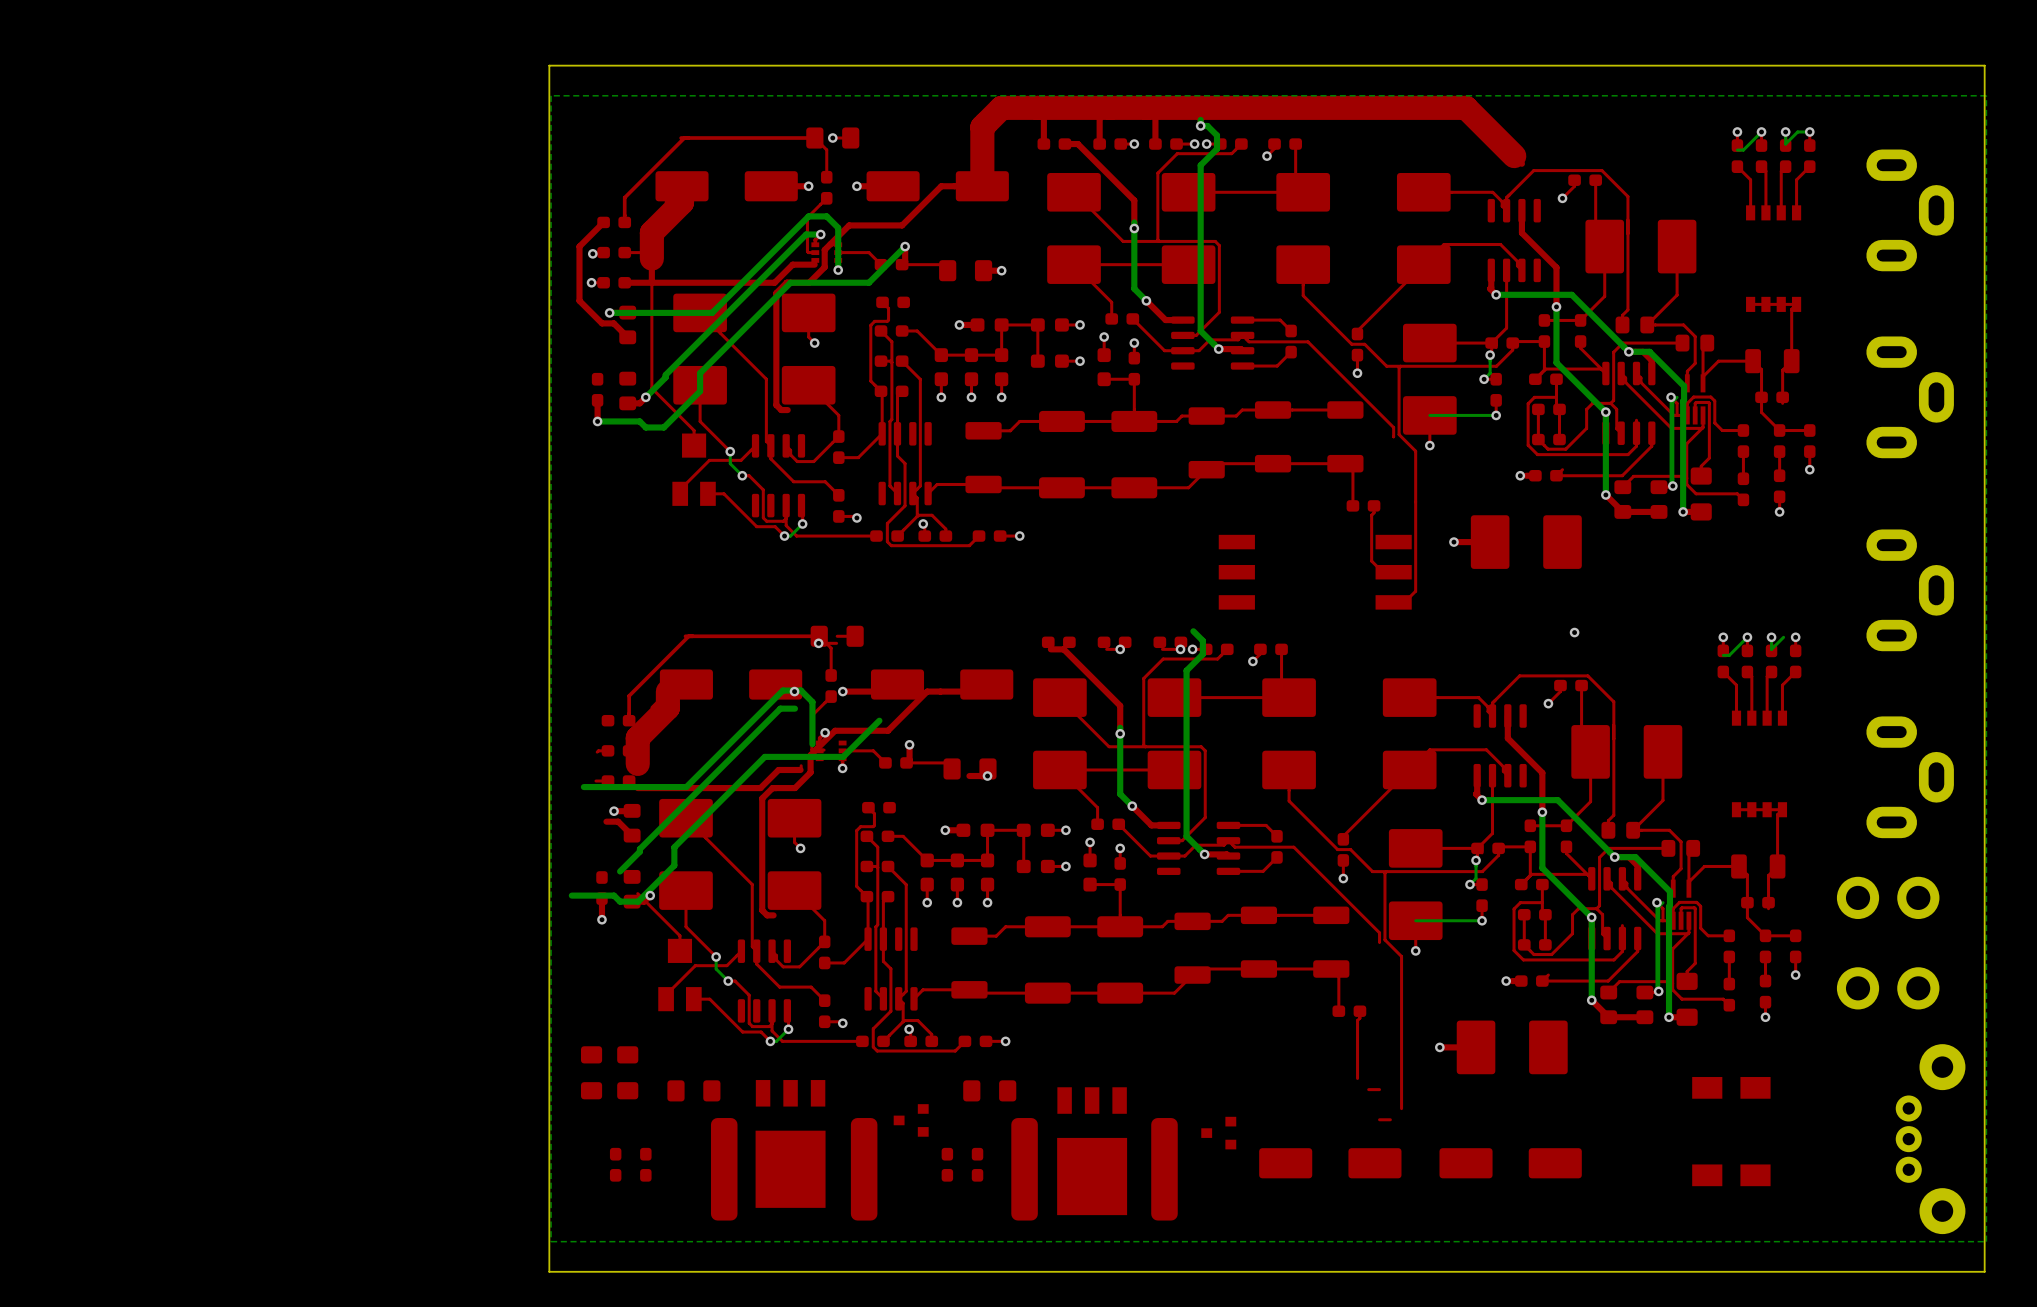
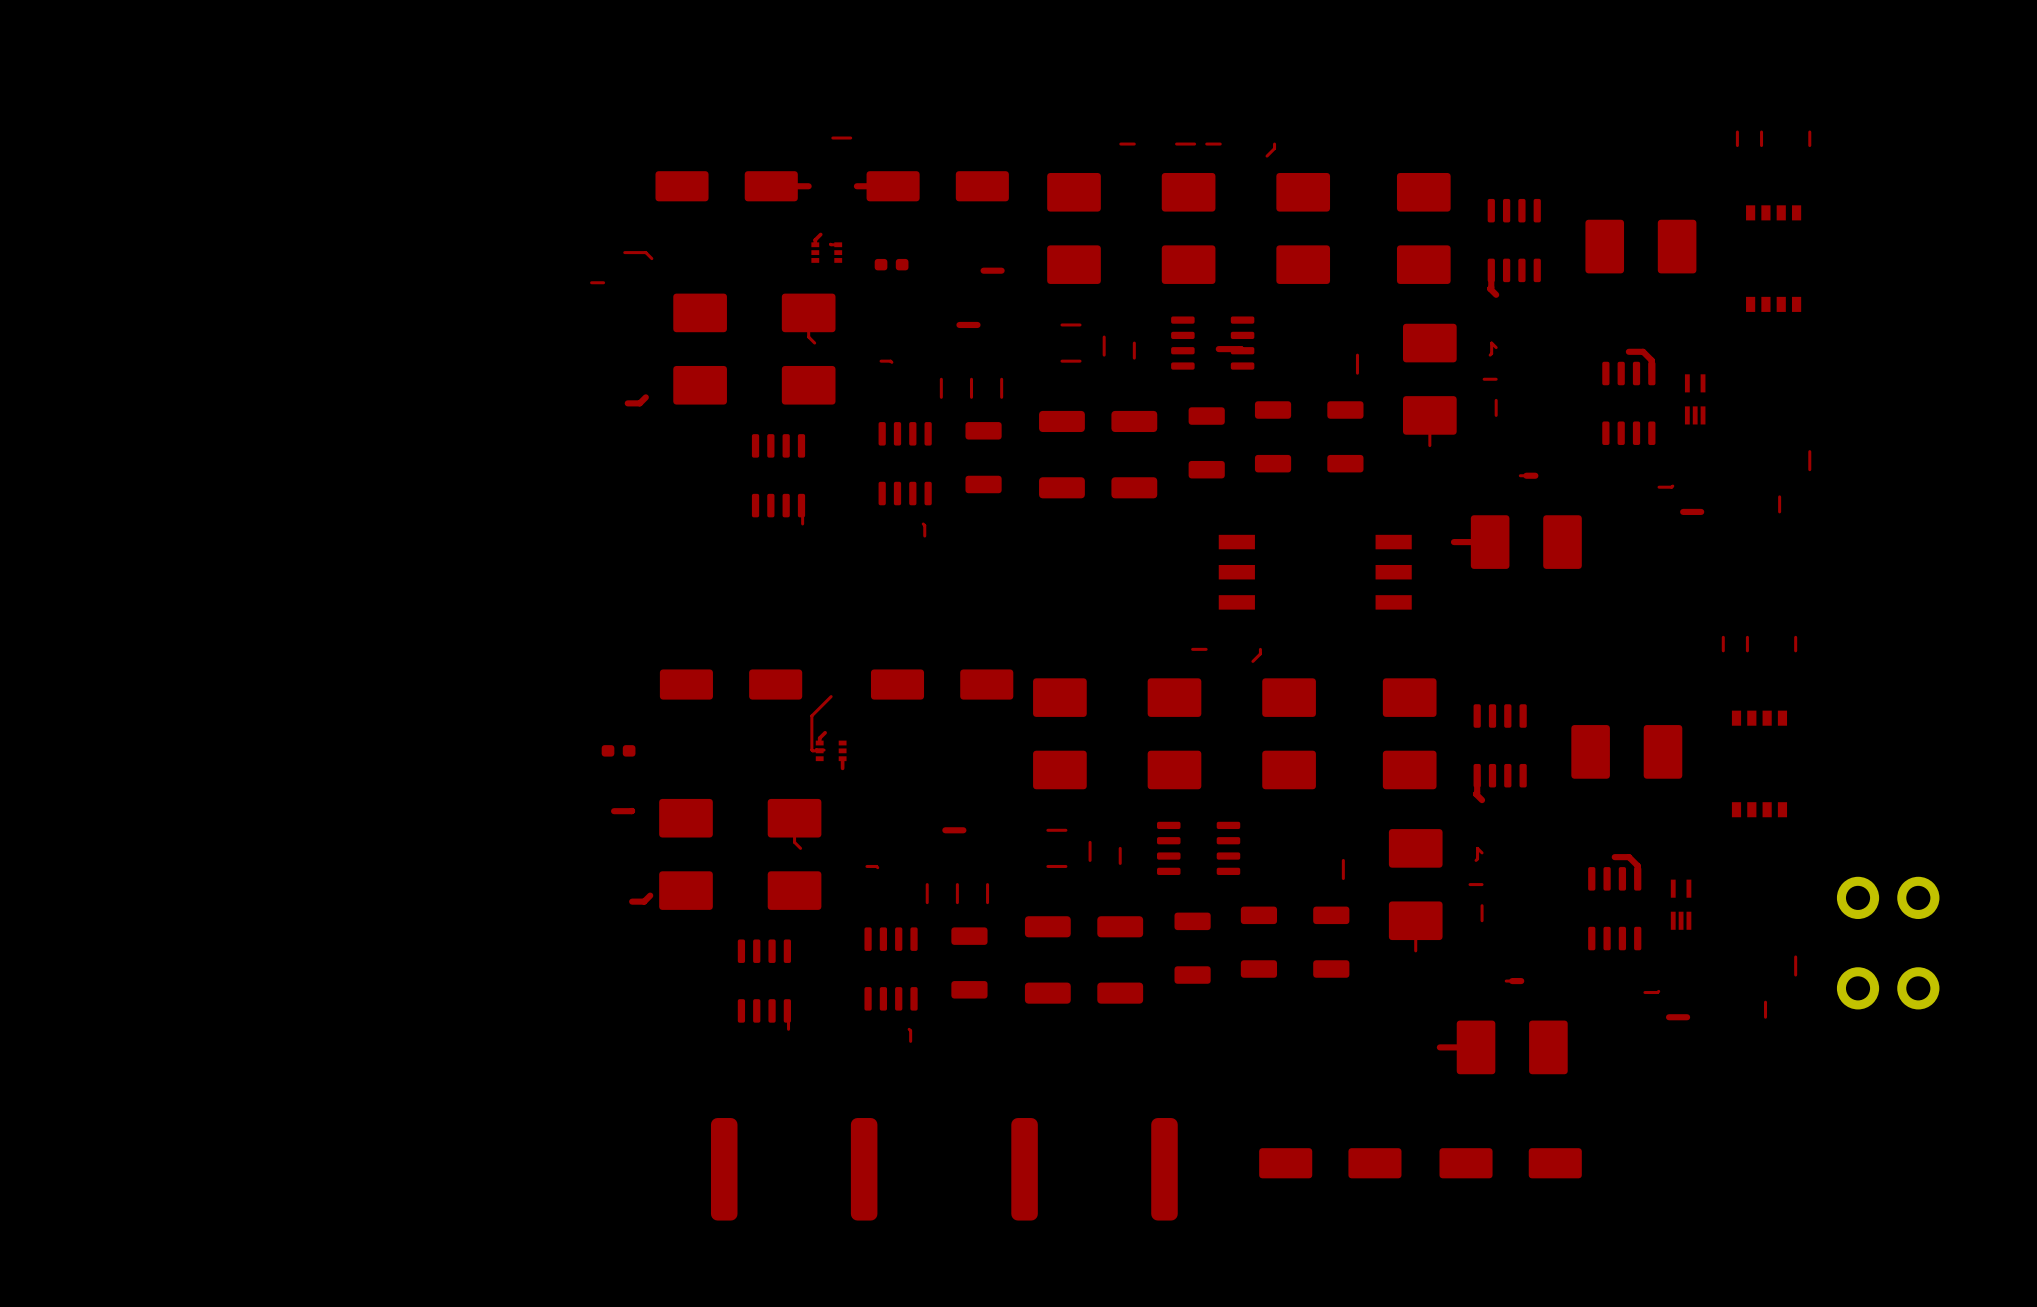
board edge: (1984, 65) (1984, 1271) (549, 1271) (549, 65) (1984, 65) -> none
bottom zone outline: (1986, 95) (551, 95) (551, 1241) (1986, 1241) (1986, 95) -> none
top track: (1037, 107) (1043, 113) (1043, 144) -> none
top track: (1110, 107) (1099, 118) (1099, 144) -> none
top track: (1146, 107) (1155, 116) (1155, 144) -> none
bottom track: (1200, 119) (1200, 125) (1207, 125) (1217, 135) (1217, 148) (1200, 165) (1200, 331) (1218, 349) -> none
via: (1200, 125) -> none
via: (1737, 131) -> none
bottom track: (1761, 131) (1743, 150) (1737, 150) -> none
via: (1761, 131) -> none
via: (1785, 131) -> none
bottom track: (1809, 131) (1797, 131) (1785, 144) (1785, 131) -> none
via: (1809, 131) -> none
top track: (681, 138) (814, 138) (826, 149) (826, 177) -> none
top track: (684, 138) (624, 197) (624, 222) -> none
part: (832, 138) -> none
via: (832, 138) -> none
part: (1054, 144) -> none
top track: (1064, 144) (1077, 144) (1134, 200) (1134, 228) -> none
part: (1110, 144) -> none
via: (1134, 144) -> none
part: (1165, 144) -> none
via: (1194, 144) -> none
via: (1206, 144) -> none
part: (1230, 144) -> none
top track: (1241, 144) (1231, 153) (1177, 153) (1157, 173) (1159, 241) -> none
part: (1285, 144) -> none
top track: (1295, 144) (1295, 184) (1303, 192) (1188, 192) -> none
via: (1267, 156) -> none
part: (1737, 156) -> none
part: (1761, 156) -> none
part: (1785, 156) -> none
part: (1809, 156) -> none
top track: (1521, 163) (1466, 107) (1001, 107) (982, 127) (982, 186) (941, 186) (902, 225) (849, 225) (824, 249) (824, 267) (809, 282) (786, 282) (776, 293) (776, 405) (781, 410) (787, 410) -> none
top track: (1737, 166) (1750, 179) (1750, 212) -> none
top track: (1761, 166) (1765, 171) (1765, 212) -> none
top track: (1785, 166) (1781, 171) (1781, 212) -> none
top track: (1809, 166) (1796, 179) (1796, 212) -> none
top track: (1574, 180) (1574, 186) (1562, 198) -> none
part: (1585, 180) -> none
top track: (1595, 180) (1595, 237) (1604, 246) (1604, 296) (1580, 320) (1544, 320) -> none
via: (808, 186) -> none
via: (856, 186) -> none
part: (826, 187) -> none
top track: (1074, 192) (1123, 241) (1215, 241) (1219, 245) (1219, 312) (1196, 335) (1182, 335) -> none
top track: (1423, 192) (1492, 192) (1502, 201) (1502, 206) (1506, 210) (1506, 197) (1533, 170) (1601, 170) (1627, 196) (1627, 309) (1622, 315) (1622, 324) -> none
top track: (826, 198) (807, 217) (807, 251) (815, 252) -> none
via: (1562, 198) -> none
top track: (666, 202) (682, 186) (682, 202) (651, 232) (651, 388) (694, 430) (694, 445) -> none
top track: (1521, 210) (1521, 233) (1556, 267) (1556, 306) -> none
part: (1910, 210) -> none
top track: (603, 222) (579, 246) (579, 300) (602, 323) (613, 323) (627, 337) -> none
part: (614, 222) -> none
bottom track: (1134, 222) (1134, 288) (1146, 300) -> none
via: (1134, 228) -> none
bottom track: (820, 234) (806, 234) (665, 374) (665, 377) (645, 397) -> none
via: (820, 234) -> none
top track: (905, 246) (905, 261) (902, 264) (941, 264) (947, 270) -> none
bottom track: (905, 246) (868, 282) (790, 282) (700, 373) (700, 391) (663, 427) (645, 427) (639, 421) (597, 421) -> none
via: (905, 246) -> none
top track: (1677, 246) (1677, 295) (1647, 324) (1683, 324) (1695, 336) (1695, 363) (1687, 371) (1687, 383) -> none
part: (614, 252) -> none
top track: (838, 252) (868, 252) (881, 264) -> none
via: (592, 253) -> none
top track: (815, 260) (814, 264) (792, 264) (774, 282) (624, 282) -> none
top track: (1188, 264) (1074, 264) (1111, 302) (1111, 318) -> none
top track: (1303, 264) (1303, 295) (1351, 344) (1364, 344) (1386, 366) (1496, 366) (1512, 349) (1514, 341) (1544, 341) (1544, 370) -> none
bottom track: (838, 270) (838, 227) (826, 216) (808, 216) (712, 312) (609, 312) -> none
via: (838, 270) -> none
part: (965, 270) -> none
via: (1001, 270) -> none
top track: (1506, 270) (1506, 328) (1491, 343) (1429, 343) -> none
top track: (1521, 270) (1517, 265) (1517, 261) (1500, 244) (1443, 244) (1357, 331) (1357, 334) -> none
via: (591, 282) -> none
part: (614, 282) -> none
bottom track: (1496, 294) (1571, 294) (1628, 351) (1649, 351) (1684, 386) (1683, 511) -> none
via: (1496, 294) -> none
top track: (1146, 300) (1165, 320) (1182, 320) -> none
via: (1146, 300) -> none
top track: (882, 302) (888, 308) (888, 320) (874, 321) (870, 325) (870, 381) (882, 392) (882, 433) (858, 457) (838, 457) -> none
part: (893, 302) -> none
top track: (1750, 304) (1796, 304) (1791, 309) (1791, 361) (1782, 370) (1782, 403) -> none
bottom track: (1556, 306) (1556, 362) (1605, 412) (1605, 494) -> none
via: (1556, 306) -> none
via: (609, 312) -> none
top track: (700, 312) (766, 379) (766, 441) (770, 445) (770, 458) (793, 481) (825, 481) (838, 495) -> none
part: (1122, 318) -> none
top track: (1132, 318) (1164, 350) (1199, 350) (1209, 339) (1238, 339) (1242, 335) (1249, 341) (1307, 341) (1393, 427) (1393, 436) -> none
top track: (1242, 320) (1280, 320) (1291, 331) -> none
part: (627, 324) -> none
via: (959, 324) -> none
part: (989, 324) -> none
part: (1049, 324) -> none
via: (1080, 324) -> none
part: (1634, 324) -> none
top track: (881, 331) (891, 341) (889, 485) (897, 493) -> none
part: (891, 331) -> none
top track: (902, 331) (917, 331) (941, 355) (1001, 355) (1001, 324) (1037, 324) (1037, 361) -> none
part: (1544, 331) -> none
part: (1580, 331) -> none
via: (1104, 337) -> none
part: (1291, 341) -> none
top track: (1580, 341) (1580, 348) (1605, 373) -> none
via: (814, 343) -> none
via: (1134, 343) -> none
part: (1502, 343) -> none
top track: (1682, 343) (1622, 343) (1613, 352) (1613, 400) (1610, 403) -> none
part: (1694, 343) -> none
part: (1357, 344) -> none
top track: (1703, 345) (1703, 383) -> none
via: (1218, 349) -> none
via: (1628, 351) -> none
top track: (1291, 352) (1277, 366) (1242, 366) -> none
bottom track: (1490, 355) (1490, 373) (1484, 379) -> none
via: (1490, 355) -> none
part: (891, 361) -> none
top track: (902, 361) (920, 379) (920, 485) (912, 493) (917, 498) (917, 516) -> none
part: (1049, 361) -> none
via: (1080, 361) -> none
part: (1772, 361) -> none
top track: (1400, 366) (1399, 434) (1415, 451) (1415, 591) (1404, 602) (1393, 602) -> none
part: (941, 367) -> none
part: (971, 367) -> none
part: (1001, 367) -> none
part: (1104, 367) -> none
part: (1134, 368) -> none
top track: (1601, 369) (1545, 369) (1535, 379) -> none
via: (1357, 373) -> none
top track: (1621, 373) (1625, 377) (1625, 382) (1671, 428) (1702, 428) -> none
top track: (1636, 373) (1640, 377) (1640, 382) (1673, 415) (1687, 415) (1687, 403) (1693, 397) (1710, 397) (1714, 401) (1714, 422) (1722, 430) (1743, 430) -> none
top track: (1703, 376) (1718, 361) (1753, 361) (1761, 369) (1761, 412) (1779, 430) (1809, 430) -> none
top track: (1104, 379) (1134, 379) (1134, 421) -> none
via: (1484, 379) -> none
part: (1545, 379) -> none
top track: (1556, 379) (1556, 406) (1559, 409) (1559, 439) -> none
top track: (700, 385) (700, 421) (730, 451) -> none
top track: (808, 385) (838, 415) (838, 436) (813, 461) (797, 461) (790, 454) (790, 450) (786, 445) -> none
part: (597, 389) -> none
part: (1496, 389) -> none
part: (627, 391) -> none
part: (891, 391) -> none
top track: (902, 391) (897, 395) (897, 456) (905, 463) (905, 505) (887, 523) (887, 541) (891, 545) (969, 545) (979, 536) -> none
via: (645, 397) -> none
via: (941, 397) -> none
via: (971, 397) -> none
via: (1001, 397) -> none
top track: (1556, 397) (1534, 397) (1528, 403) (1528, 445) (1537, 454) (1628, 454) (1636, 446) (1636, 420) -> none
top track: (1671, 397) (1677, 403) (1677, 415) -> none
via: (1671, 397) -> none
bottom track: (1677, 397) (1672, 401) (1672, 486) (1671, 484) (1671, 397) -> none
part: (1772, 397) -> none
part: (1910, 397) -> none
top track: (597, 400) (597, 421) -> none
top track: (1610, 403) (1616, 409) (1616, 428) (1621, 433) -> none
top track: (1610, 403) (1592, 403) (1586, 409) (1586, 428) (1565, 449) (1548, 449) (1538, 439) (1538, 409) -> none
part: (1548, 409) -> none
top track: (1345, 410) (1242, 410) (1236, 416) (1181, 416) (1176, 421) (1019, 421) (1010, 430) (983, 430) -> none
via: (1605, 412) -> none
bottom track: (1496, 415) (1429, 415) -> none
via: (1496, 415) -> none
top track: (1695, 415) (1696, 402) (1709, 403) (1709, 458) (1701, 466) (1701, 476) -> none
top track: (1703, 415) (1703, 427) (1686, 443) (1686, 484) (1696, 493) (1737, 493) (1743, 499) -> none
via: (597, 421) -> none
top track: (1651, 433) (1651, 446) (1622, 475) (1556, 475) (1562, 469) -> none
part: (1548, 439) -> none
part: (1743, 441) -> none
part: (1779, 441) -> none
part: (1809, 441) -> none
top track: (755, 445) (741, 460) (709, 460) (680, 489) (680, 493) -> none
via: (1429, 445) -> none
part: (838, 447) -> none
bottom track: (730, 451) (730, 463) (742, 475) -> none
via: (730, 451) -> none
top track: (1743, 451) (1743, 478) -> none
top track: (1779, 451) (1779, 475) -> none
part: (694, 469) -> none
via: (1809, 469) -> none
top track: (742, 475) (749, 475) (763, 489) (763, 517) (766, 521) (783, 521) (786, 518) -> none
via: (742, 475) -> none
via: (1520, 475) -> none
part: (1545, 475) -> none
top track: (1686, 478) (1684, 476) (1633, 476) (1622, 487) -> none
via: (1672, 486) -> none
part: (1779, 486) -> none
part: (1743, 489) -> none
top track: (707, 493) (723, 493) (756, 526) (775, 526) (784, 536) -> none
top track: (928, 493) (937, 484) (983, 484) (986, 487) (1188, 487) (1212, 463) (1345, 463) (1352, 471) (1352, 505) -> none
part: (1701, 493) -> none
top track: (1605, 494) (1622, 511) (1659, 511) -> none
via: (1605, 494) -> none
part: (1622, 499) -> none
part: (1659, 499) -> none
top track: (786, 505) (786, 525) (796, 536) (876, 536) -> none
part: (838, 505) -> none
part: (1363, 505) -> none
top track: (1374, 505) (1374, 512) (1371, 515) (1371, 561) (1382, 572) (1393, 572) -> none
via: (1683, 511) -> none
via: (1779, 511) -> none
top track: (838, 516) (856, 517) -> none
via: (856, 517) -> none
bottom track: (802, 523) (790, 536) (784, 536) -> none
via: (802, 523) -> none
via: (923, 523) -> none
via: (784, 536) -> none
part: (887, 536) -> none
part: (935, 536) -> none
top track: (945, 536) (945, 529) (931, 515) (918, 515) (897, 536) -> none
part: (989, 536) -> none
top track: (1019, 536) (1000, 536) -> none
via: (1019, 536) -> none
via: (1453, 542) -> none
part: (1910, 590) -> none
bottom track: (1193, 631) (1202, 640) (1202, 654) (1186, 670) (1186, 836) (1204, 854) -> none
via: (1574, 632) -> none
top track: (685, 636) (819, 636) (831, 648) (831, 675) -> none
top track: (688, 636) (629, 695) (629, 720) -> none
part: (837, 636) -> none
top track: (855, 636) (837, 636) -> none
via: (1723, 637) -> none
bottom track: (1747, 637) (1729, 655) (1723, 655) -> none
via: (1747, 637) -> none
via: (1771, 637) -> none
bottom track: (1783, 637) (1771, 649) (1771, 637) -> none
via: (1795, 637) -> none
part: (1058, 642) -> none
part: (1114, 642) -> none
part: (1170, 642) -> none
via: (818, 643) -> none
top track: (836, 643) (818, 643) -> none
top track: (1050, 649) (1063, 649) (1120, 705) (1120, 733) -> none
top track: (1120, 649) (1106, 649) -> none
via: (1120, 649) -> none
top track: (1180, 649) (1162, 649) -> none
via: (1180, 649) -> none
via: (1192, 649) -> none
part: (1216, 649) -> none
top track: (1227, 649) (1217, 659) (1163, 659) (1143, 678) (1145, 746) -> none
part: (1270, 649) -> none
top track: (1281, 649) (1281, 690) (1289, 697) (1174, 697) -> none
via: (1252, 661) -> none
part: (1723, 661) -> none
part: (1747, 661) -> none
part: (1771, 661) -> none
part: (1795, 661) -> none
top track: (1723, 671) (1736, 685) (1736, 718) -> none
top track: (1747, 671) (1751, 676) (1751, 718) -> none
top track: (1771, 671) (1767, 676) (1767, 718) -> none
top track: (1795, 671) (1782, 685) (1782, 718) -> none
top track: (1560, 685) (1560, 691) (1548, 703) -> none
part: (1571, 685) -> none
top track: (1581, 685) (1581, 742) (1590, 751) (1590, 801) (1566, 825) (1530, 825) -> none
part: (831, 686) -> none
via: (794, 691) -> none
via: (842, 691) -> none
top track: (878, 691) (842, 691) -> none
top track: (968, 691) (927, 691) (888, 730) (835, 730) (810, 755) (810, 772) (795, 788) (772, 788) (762, 798) (762, 910) (767, 915) (773, 915) -> none
top track: (1059, 697) (1109, 746) (1201, 746) (1205, 750) (1205, 817) (1182, 840) (1168, 840) -> none
top track: (1409, 697) (1478, 697) (1488, 706) (1488, 711) (1492, 716) (1492, 703) (1519, 675) (1587, 675) (1613, 701) (1613, 815) (1608, 820) (1608, 830) -> none
via: (1548, 703) -> none
top track: (651, 707) (667, 691) (667, 707) (637, 738) (637, 763) -> none
bottom track: (794, 708) (780, 708) (639, 849) (639, 851) (620, 871) -> none
top track: (1507, 716) (1507, 738) (1542, 772) (1542, 812) -> none
part: (618, 720) -> none
bottom track: (879, 720) (843, 756) (764, 756) (674, 847) (674, 865) (638, 901) (620, 901) (614, 895) (571, 895) -> none
bottom track: (1120, 727) (1120, 794) (1132, 806) -> none
via: (825, 732) -> none
via: (1120, 733) -> none
bottom track: (812, 744) (812, 702) (801, 690) (782, 690) (686, 787) (583, 787) -> none
top track: (909, 744) (909, 759) (906, 762) (946, 762) (952, 768) -> none
via: (909, 744) -> none
top track: (608, 750) (597, 752) -> none
top track: (843, 750) (873, 750) (885, 762) -> none
top track: (1662, 751) (1662, 800) (1633, 830) (1669, 830) (1681, 841) (1681, 868) (1673, 876) (1673, 888) -> none
part: (895, 762) -> none
top track: (801, 765) (800, 769) (778, 769) (760, 788) (637, 788) -> none
via: (842, 768) -> none
part: (970, 768) -> none
top track: (1174, 769) (1059, 769) (1097, 807) (1097, 824) -> none
top track: (1289, 769) (1289, 800) (1337, 849) (1350, 849) (1372, 871) (1482, 871) (1498, 855) (1500, 846) (1530, 846) (1530, 875) -> none
top track: (1492, 775) (1492, 833) (1477, 848) (1415, 848) -> none
top track: (1507, 775) (1503, 771) (1503, 766) (1486, 749) (1429, 749) (1343, 836) (1343, 839) -> none
top track: (987, 776) (969, 776) -> none
via: (987, 776) -> none
part: (1910, 777) -> none
top track: (608, 781) (595, 781) -> none
part: (618, 781) -> none
bottom track: (1482, 800) (1557, 800) (1614, 857) (1635, 857) (1669, 891) (1669, 1017) -> none
via: (1482, 800) -> none
top track: (1132, 806) (1151, 825) (1168, 825) -> none
via: (1132, 806) -> none
top track: (868, 807) (874, 813) (874, 825) (860, 826) (856, 830) (856, 886) (868, 897) (868, 939) (844, 962) (824, 962) -> none
part: (878, 807) -> none
top track: (1736, 809) (1782, 809) (1777, 814) (1777, 866) (1768, 875) (1768, 908) -> none
via: (614, 811) -> none
bottom track: (1542, 812) (1542, 868) (1591, 917) (1591, 1000) -> none
via: (1542, 812) -> none
top track: (685, 818) (752, 884) (752, 946) (756, 951) (756, 964) (779, 987) (811, 987) (824, 1000) -> none
top track: (606, 821) (618, 821) (632, 835) -> none
part: (632, 823) -> none
part: (1108, 824) -> none
top track: (1118, 824) (1150, 856) (1184, 856) (1195, 845) (1223, 845) (1228, 840) (1234, 847) (1293, 847) (1379, 932) (1379, 942) -> none
top track: (1228, 825) (1266, 825) (1277, 836) -> none
via: (945, 830) -> none
part: (975, 830) -> none
part: (1035, 830) -> none
via: (1065, 830) -> none
part: (1620, 830) -> none
top track: (866, 836) (877, 847) (875, 991) (883, 998) -> none
part: (877, 836) -> none
top track: (888, 836) (903, 836) (927, 860) (987, 860) (987, 830) (1023, 830) (1023, 866) -> none
part: (1530, 836) -> none
part: (1566, 836) -> none
via: (1090, 842) -> none
part: (1277, 846) -> none
top track: (1566, 846) (1566, 853) (1591, 878) -> none
via: (800, 848) -> none
via: (1120, 848) -> none
part: (1488, 848) -> none
top track: (1668, 848) (1608, 848) (1599, 857) (1599, 905) (1596, 908) -> none
part: (1680, 848) -> none
part: (1343, 849) -> none
top track: (1688, 850) (1688, 888) -> none
top track: (1204, 854) (1226, 854) (1228, 856) -> none
via: (1204, 854) -> none
top track: (1277, 857) (1263, 871) (1228, 871) -> none
via: (1614, 857) -> none
bottom track: (1476, 860) (1476, 878) (1470, 884) -> none
via: (1476, 860) -> none
part: (877, 866) -> none
top track: (888, 866) (906, 884) (906, 991) (898, 998) (903, 1003) (903, 1021) -> none
part: (1035, 866) -> none
via: (1065, 866) -> none
part: (1758, 866) -> none
top track: (1386, 871) (1384, 939) (1401, 956) (1401, 1108) -> none
part: (927, 872) -> none
part: (957, 872) -> none
part: (987, 872) -> none
part: (1090, 872) -> none
part: (1120, 874) -> none
top track: (1587, 874) (1531, 874) (1521, 884) -> none
via: (1343, 878) -> none
top track: (1607, 878) (1611, 883) (1611, 887) (1657, 933) (1688, 933) -> none
top track: (1622, 878) (1626, 883) (1626, 887) (1659, 920) (1673, 920) (1673, 908) (1679, 902) (1696, 902) (1700, 906) (1700, 928) (1708, 935) (1729, 935) -> none
top track: (1688, 882) (1704, 866) (1738, 866) (1747, 874) (1747, 917) (1765, 935) (1795, 935) -> none
top track: (1090, 884) (1120, 884) (1120, 926) -> none
via: (1470, 884) -> none
part: (1531, 884) -> none
top track: (1542, 884) (1542, 911) (1545, 914) (1545, 944) -> none
part: (601, 888) -> none
part: (632, 889) -> none
top track: (685, 890) (685, 926) (716, 956) -> none
top track: (794, 890) (824, 920) (824, 941) (799, 966) (783, 966) (776, 960) (776, 955) (772, 951) -> none
top track: (637, 893) (679, 935) (679, 950) -> none
via: (650, 895) -> none
part: (1482, 895) -> none
part: (877, 896) -> none
top track: (888, 896) (883, 901) (883, 961) (890, 968) (890, 1011) (873, 1028) (873, 1047) (877, 1051) (955, 1051) (964, 1041) -> none
top track: (601, 898) (601, 919) -> none
via: (927, 902) -> none
via: (957, 902) -> none
via: (987, 902) -> none
top track: (1542, 902) (1520, 902) (1514, 909) (1514, 950) (1523, 959) (1613, 959) (1622, 951) (1622, 925) -> none
top track: (1656, 902) (1662, 908) (1662, 920) -> none
via: (1656, 902) -> none
bottom track: (1662, 902) (1658, 906) (1658, 991) (1656, 989) (1656, 902) -> none
part: (1757, 902) -> none
top track: (1596, 908) (1602, 914) (1602, 934) (1607, 938) -> none
top track: (1596, 908) (1578, 908) (1572, 914) (1572, 933) (1551, 954) (1533, 954) (1524, 944) (1524, 914) -> none
part: (1534, 914) -> none
top track: (1331, 915) (1228, 915) (1222, 921) (1167, 921) (1162, 926) (1005, 926) (996, 936) (969, 936) -> none
via: (1591, 917) -> none
via: (601, 919) -> none
bottom track: (1482, 920) (1415, 920) -> none
via: (1482, 920) -> none
top track: (1681, 920) (1681, 907) (1695, 908) (1695, 963) (1687, 971) (1687, 981) -> none
top track: (1688, 920) (1688, 932) (1672, 949) (1672, 989) (1681, 999) (1723, 999) (1729, 1005) -> none
top track: (1637, 938) (1637, 951) (1608, 981) (1542, 981) (1548, 975) -> none
part: (1534, 944) -> none
part: (1729, 946) -> none
part: (1765, 946) -> none
part: (1795, 946) -> none
via: (1415, 950) -> none
top track: (741, 951) (726, 965) (695, 965) (666, 994) (666, 999) -> none
part: (824, 952) -> none
bottom track: (716, 956) (716, 969) (728, 981) -> none
via: (716, 956) -> none
top track: (1729, 956) (1729, 984) -> none
top track: (1765, 956) (1765, 981) -> none
part: (679, 975) -> none
via: (1795, 975) -> none
top track: (728, 981) (735, 981) (749, 995) (749, 1023) (752, 1026) (769, 1026) (772, 1023) -> none
via: (728, 981) -> none
via: (1506, 981) -> none
part: (1531, 981) -> none
top track: (1672, 983) (1670, 981) (1619, 981) (1608, 992) -> none
via: (1658, 991) -> none
part: (1765, 991) -> none
part: (1729, 994) -> none
top track: (914, 998) (923, 989) (969, 989) (972, 993) (1174, 993) (1198, 969) (1331, 969) (1338, 976) (1338, 1011) -> none
top track: (693, 999) (709, 999) (742, 1032) (761, 1032) (770, 1041) -> none
part: (1687, 999) -> none
top track: (1591, 1000) (1608, 1017) (1644, 1017) -> none
via: (1591, 1000) -> none
part: (1608, 1004) -> none
part: (1644, 1004) -> none
top track: (772, 1010) (772, 1030) (782, 1041) (862, 1041) -> none
part: (824, 1011) -> none
part: (1349, 1011) -> none
top track: (1359, 1011) (1359, 1018) (1357, 1020) (1357, 1078) -> none
via: (1669, 1017) -> none
via: (1765, 1017) -> none
top track: (824, 1021) (842, 1023) -> none
via: (842, 1023) -> none
bottom track: (788, 1029) (776, 1041) (770, 1041) -> none
via: (788, 1029) -> none
via: (909, 1029) -> none
via: (770, 1041) -> none
part: (872, 1041) -> none
part: (921, 1041) -> none
top track: (931, 1041) (931, 1034) (917, 1020) (904, 1020) (883, 1041) -> none
part: (975, 1041) -> none
top track: (1005, 1041) (986, 1041) -> none
via: (1005, 1041) -> none
via: (1439, 1047) -> none
part: (591, 1072) -> none
part: (627, 1072) -> none
part: (1731, 1087) -> none
top track: (1379, 1089) (1368, 1089) -> none
part: (693, 1090) -> none
part: (989, 1090) -> none
top track: (1390, 1119) (1379, 1119) -> none
part: (911, 1120) -> none
part: (1218, 1133) -> none
part: (1930, 1139) -> none
part: (790, 1143) -> none
part: (1092, 1151) -> none
part: (615, 1164) -> none
part: (645, 1164) -> none
part: (947, 1164) -> none
part: (977, 1164) -> none
part: (1731, 1175) -> none

